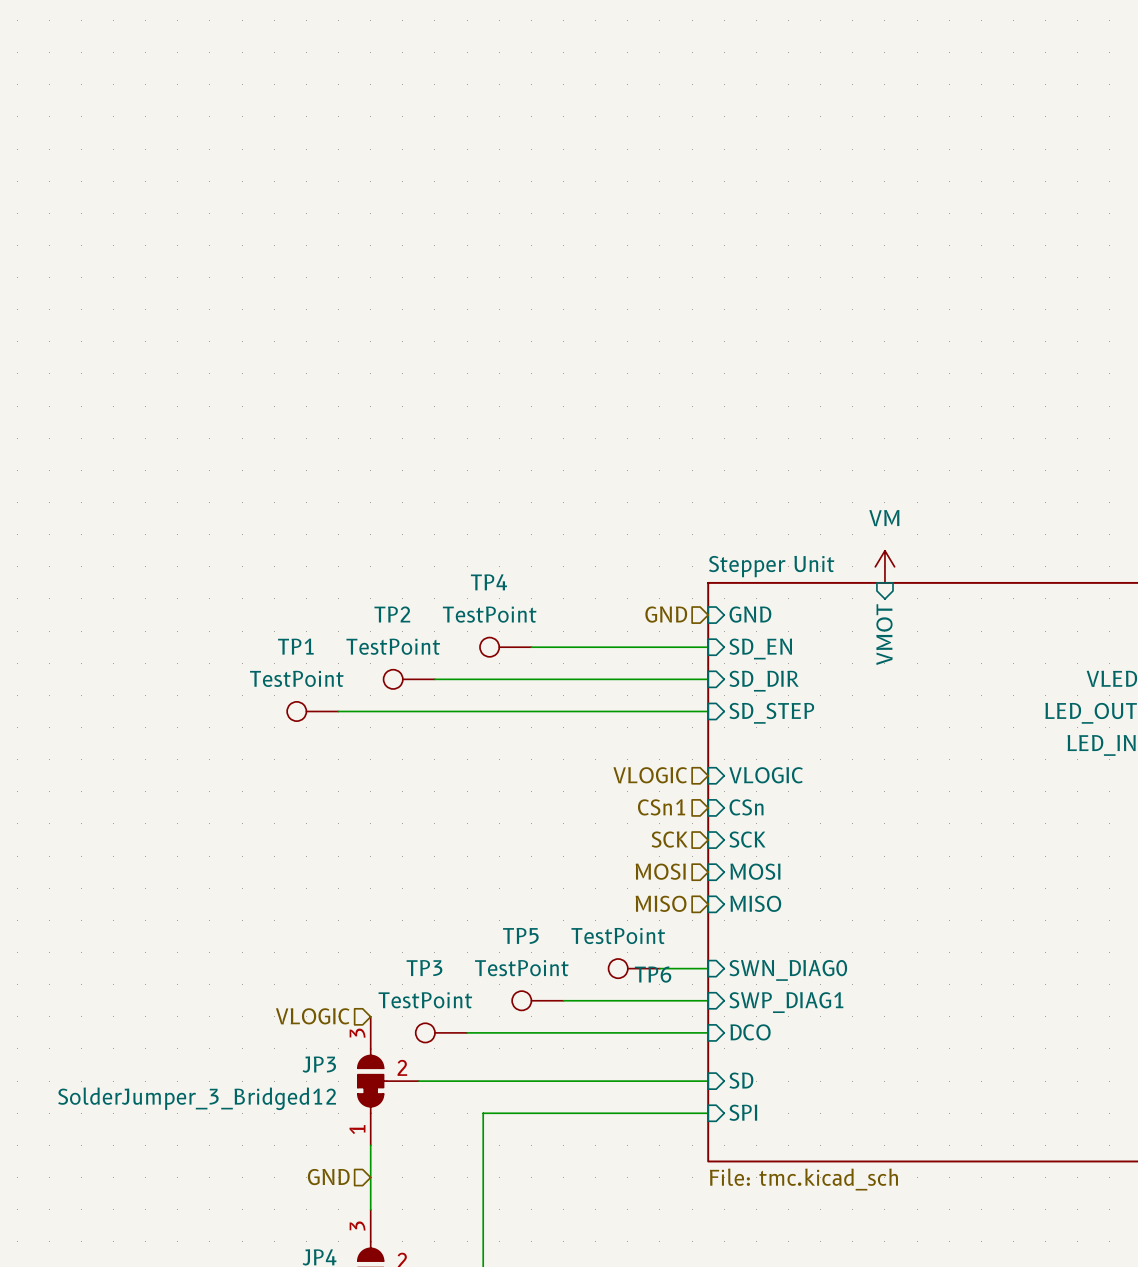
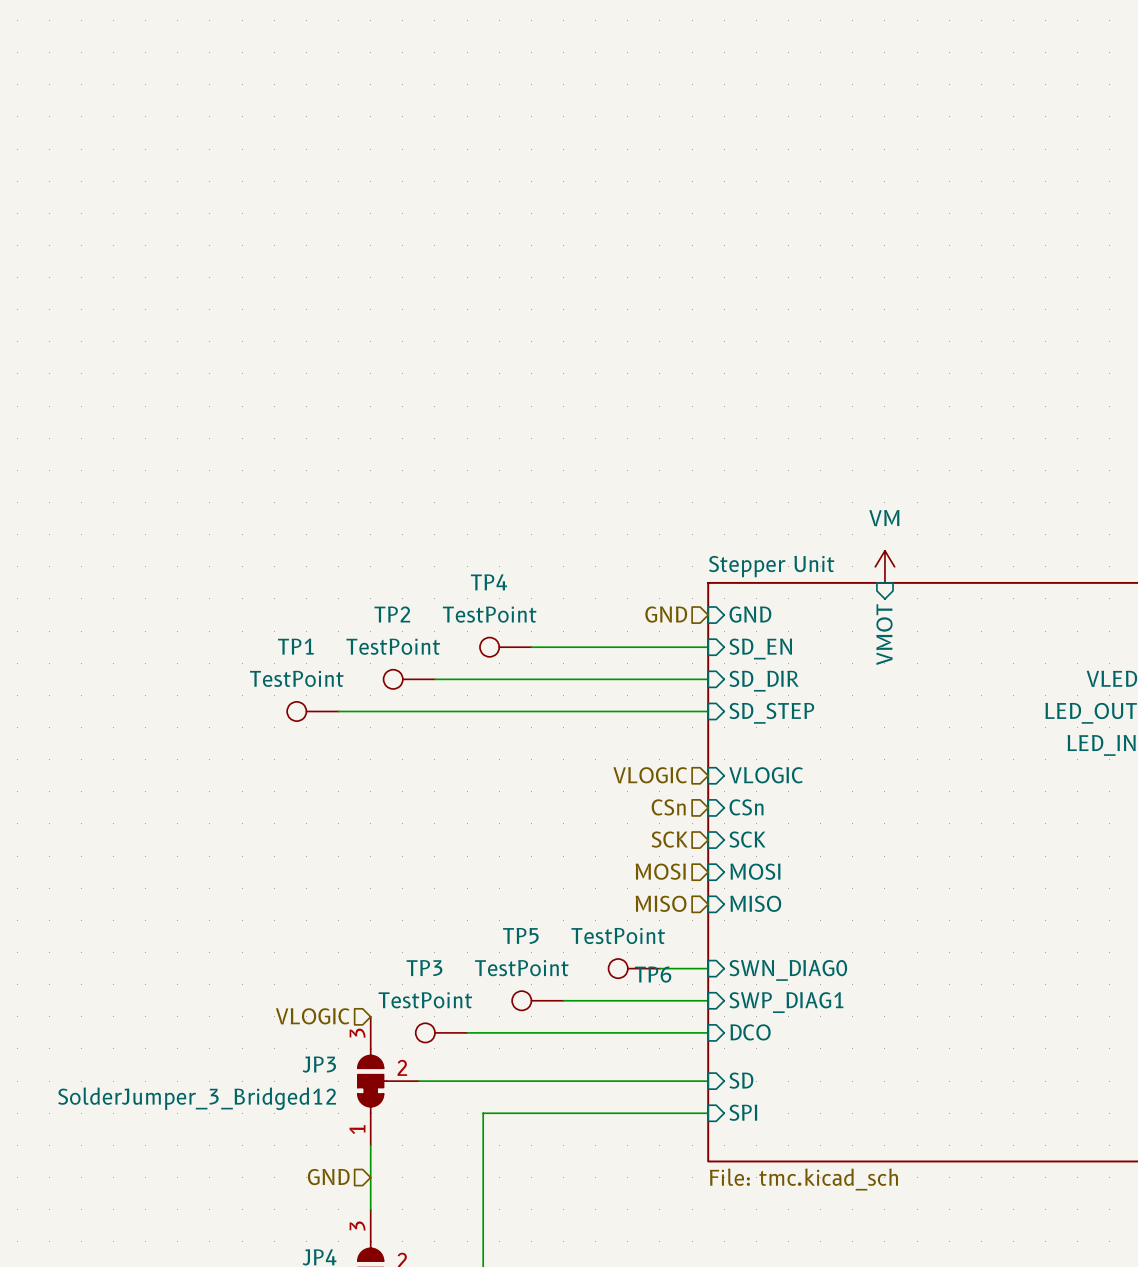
hierarchical label: CSn1 (661, 807) -> CSn (668, 807)

